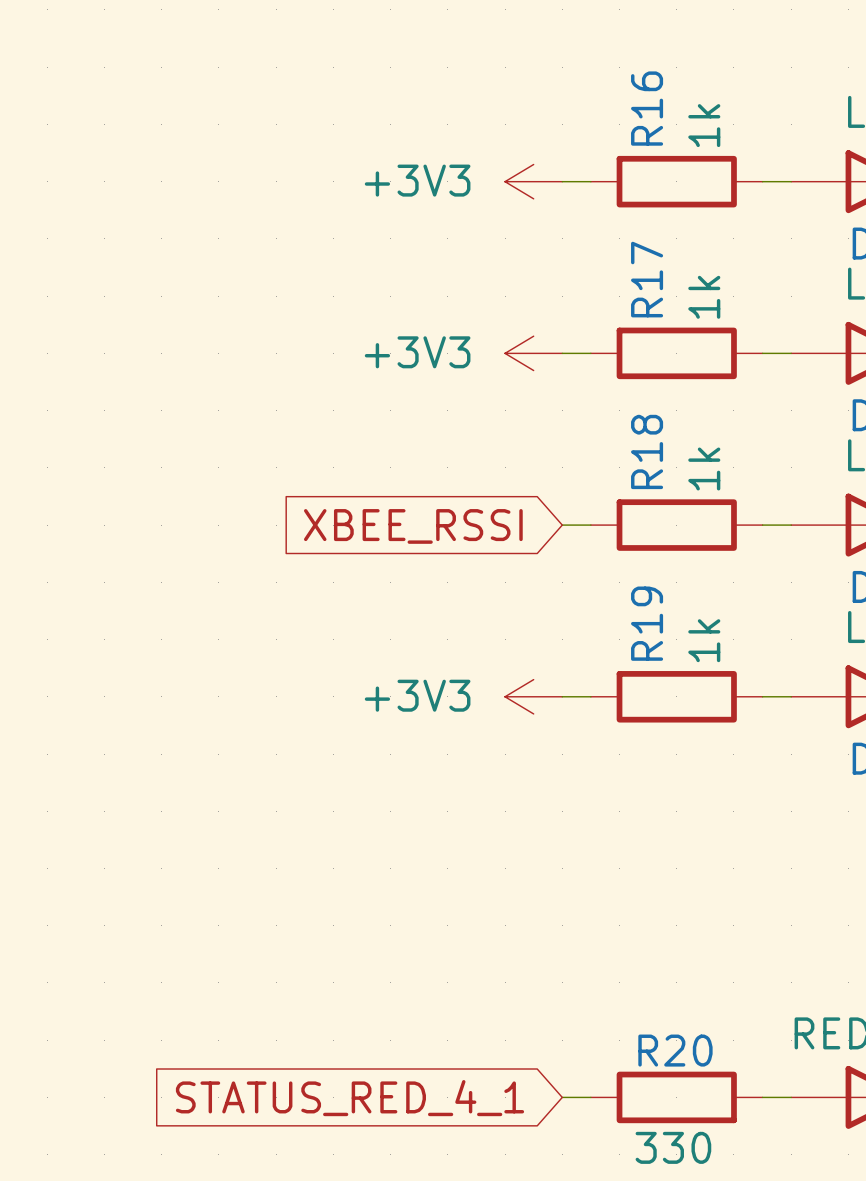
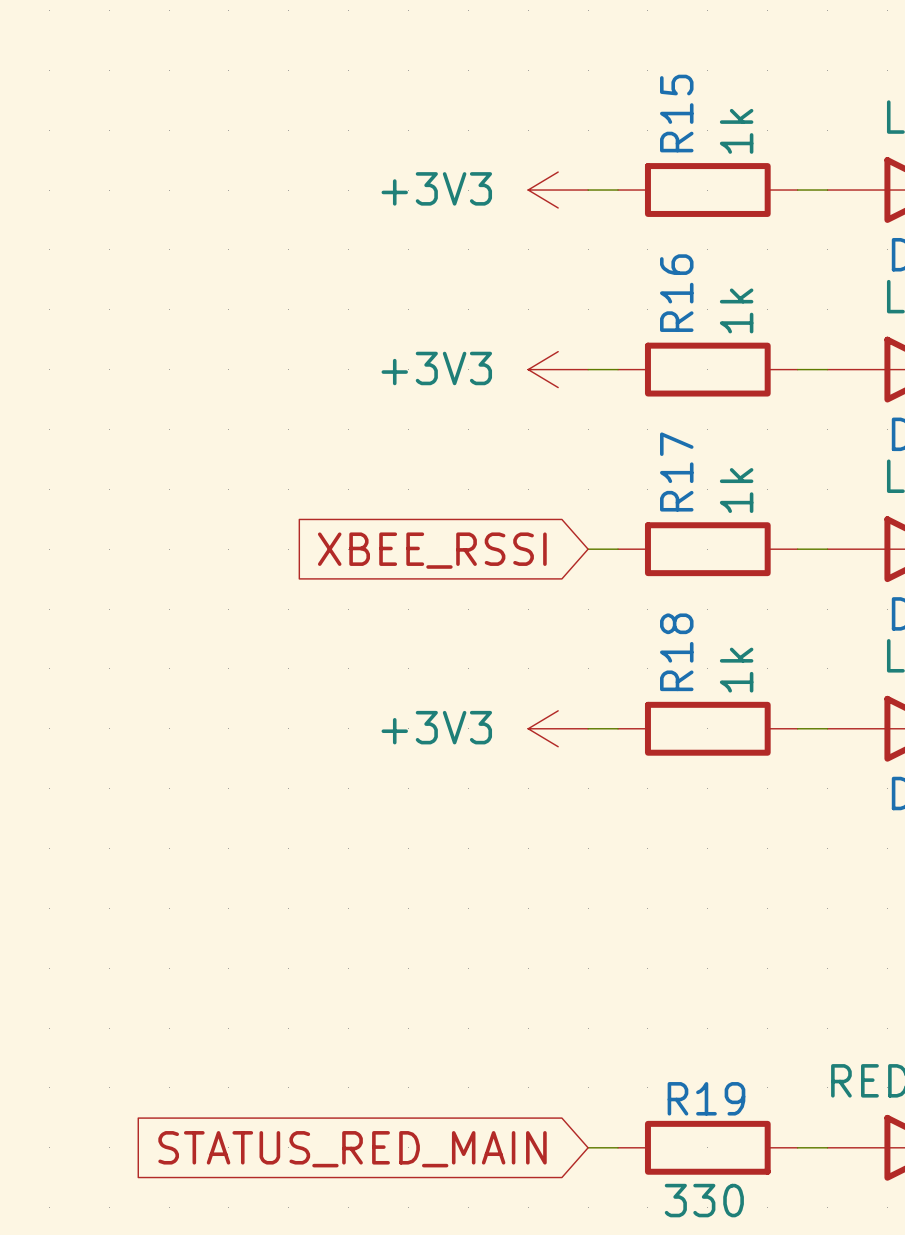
R16 name: R16 (647, 108) -> R15 (676, 113)
R17 name: R17 (647, 279) -> R16 (676, 293)
R18 name: R18 (647, 451) -> R17 (676, 471)
R19 name: R19 (647, 623) -> R18 (676, 652)
R20 name: R20 (675, 1050) -> R19 (706, 1098)
global label: STATUS_RED_4_1 (349, 1098) -> STATUS_RED_MAIN (352, 1149)

